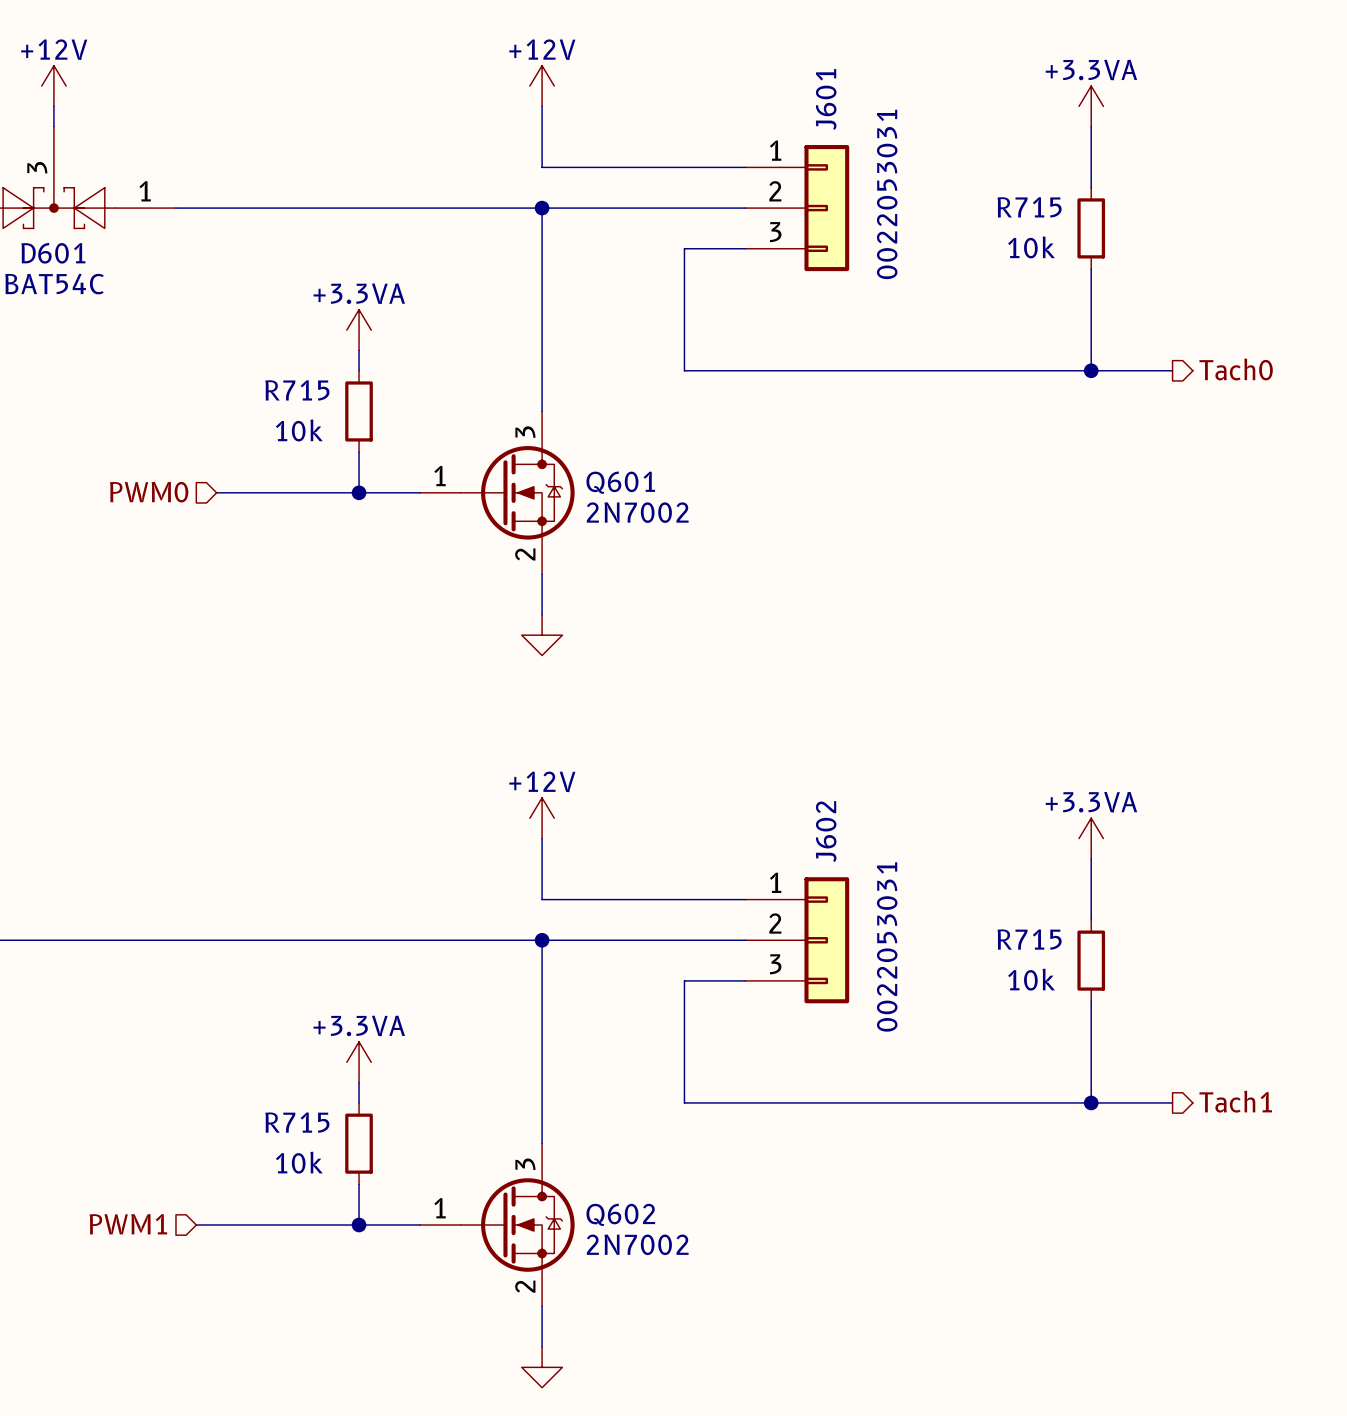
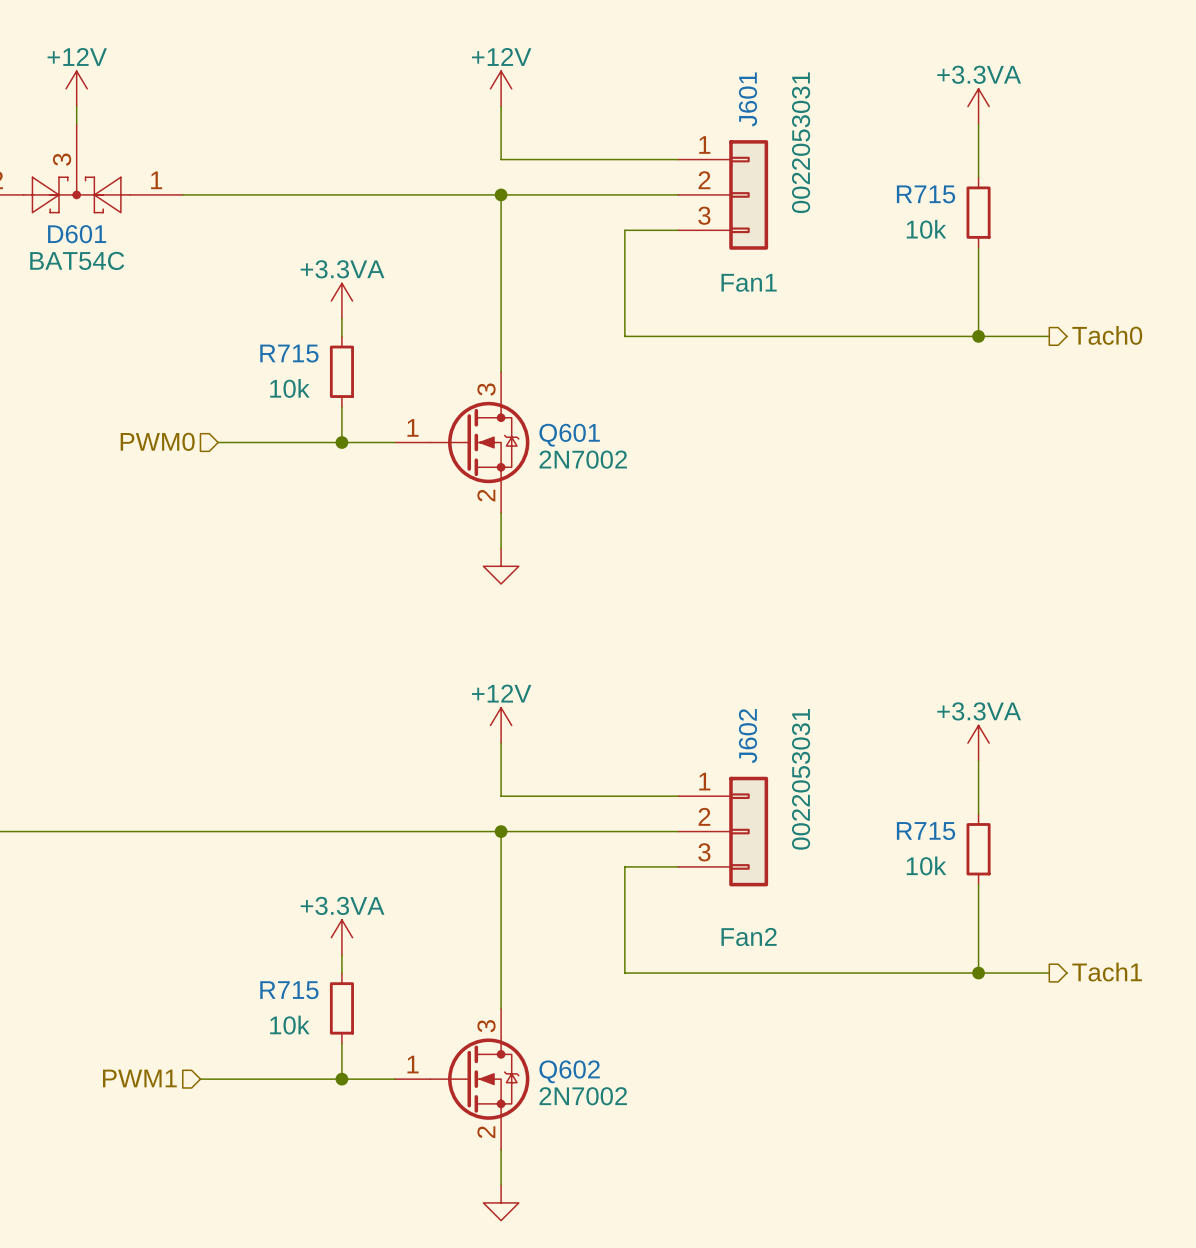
J601 value position: 0022053031 (887, 194) -> 0022053031 (801, 142)
J601 text: none -> Fan1 (749, 282)
J602 value position: 0022053031 (887, 946) -> 0022053031 (801, 779)
J602 text: none -> Fan2 (749, 937)

